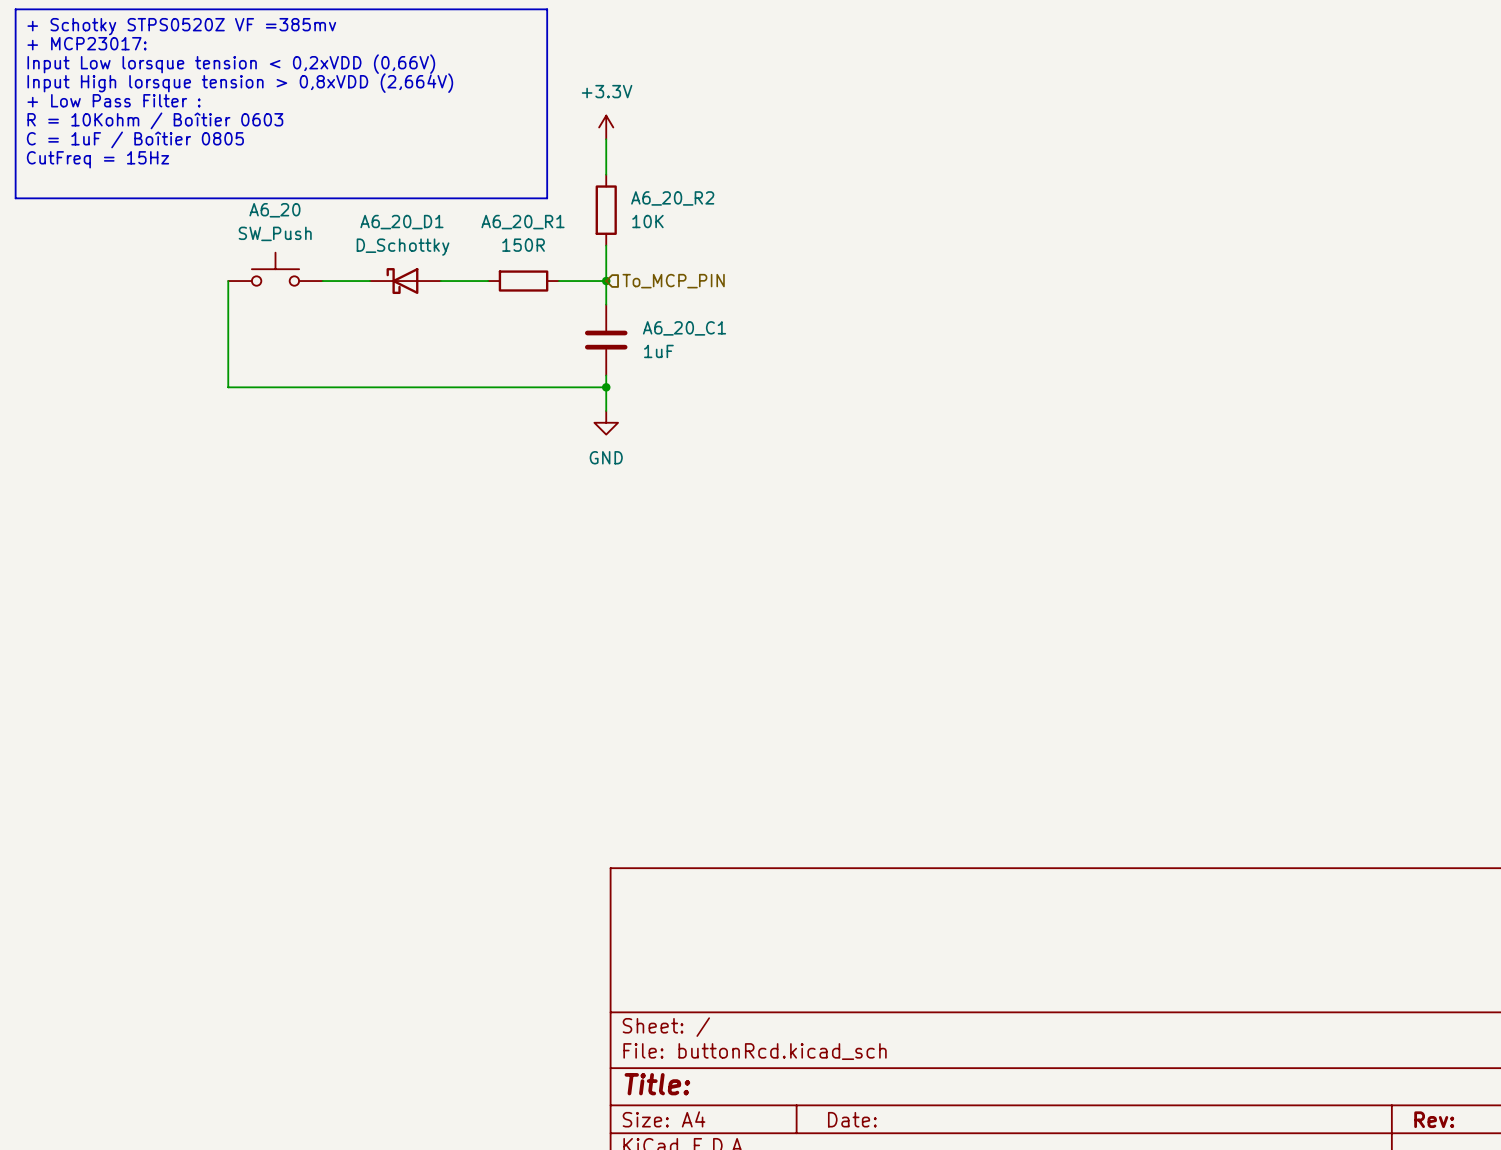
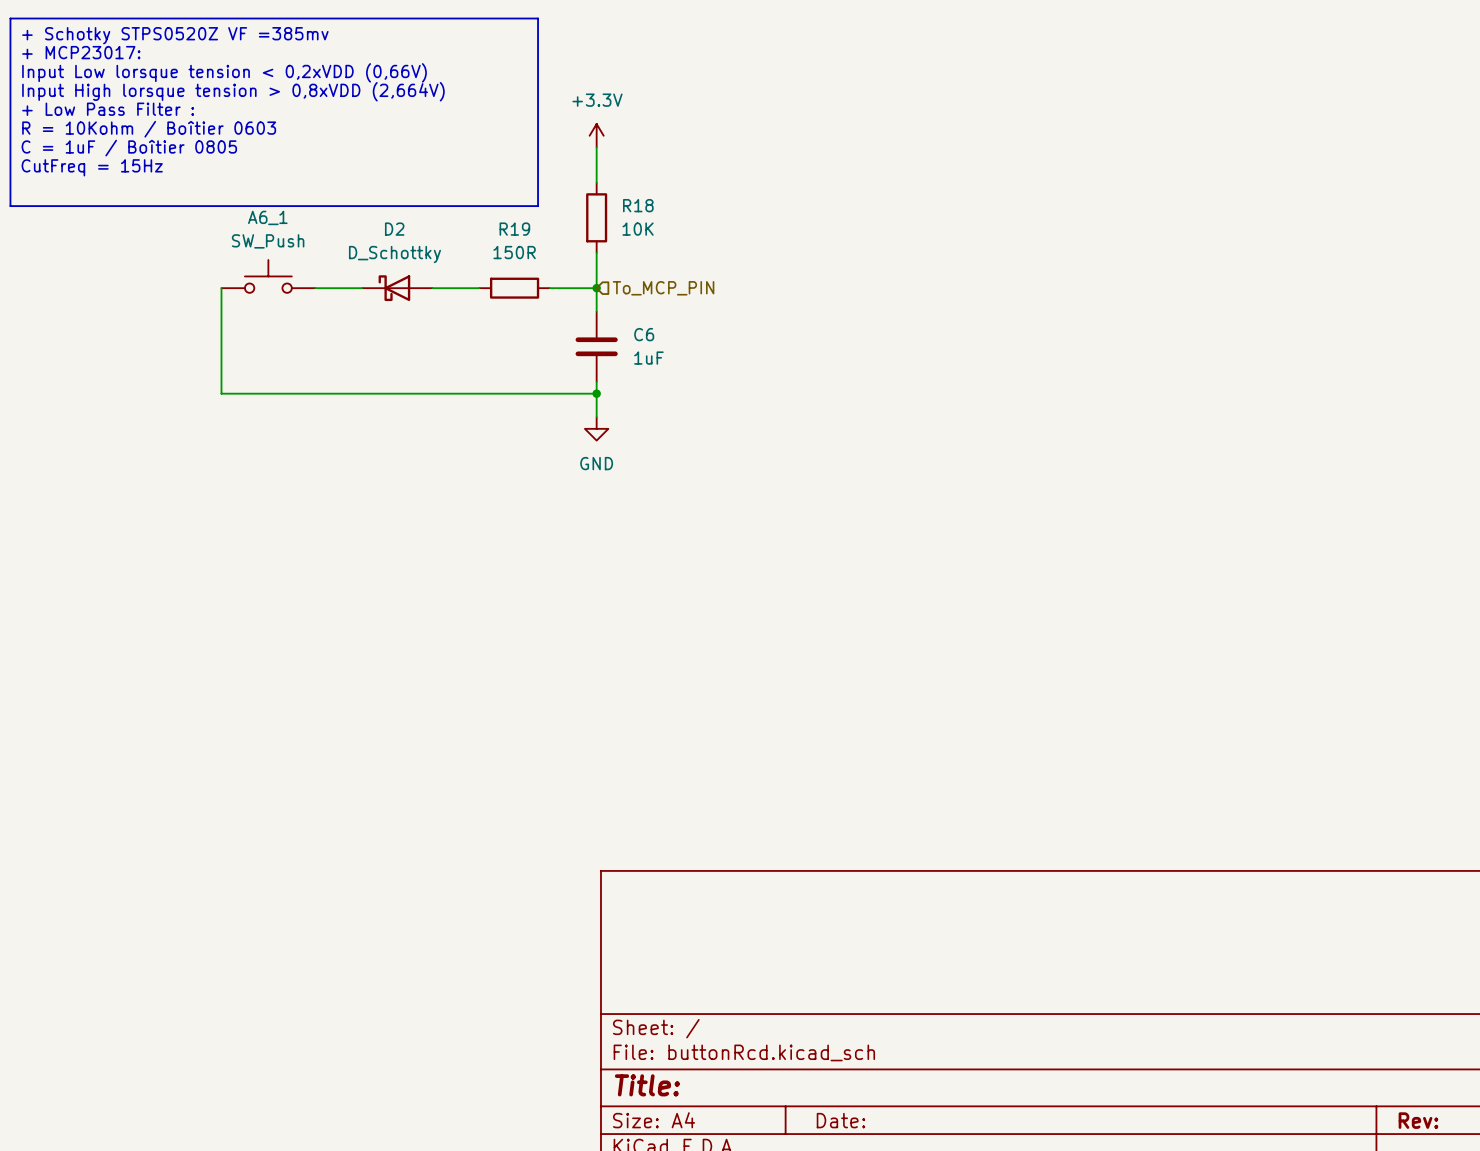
A6_20_R2 name: A6_20_R2 (672, 198) -> R18 (638, 205)
A6_20 name: A6_20 (274, 210) -> A6_1 (267, 217)
A6_20_D1 name: A6_20_D1 (401, 222) -> D2 (394, 229)
A6_20_R1 name: A6_20_R1 (522, 222) -> R19 (514, 229)
A6_20_C1 name: A6_20_C1 (684, 328) -> C6 (644, 334)

